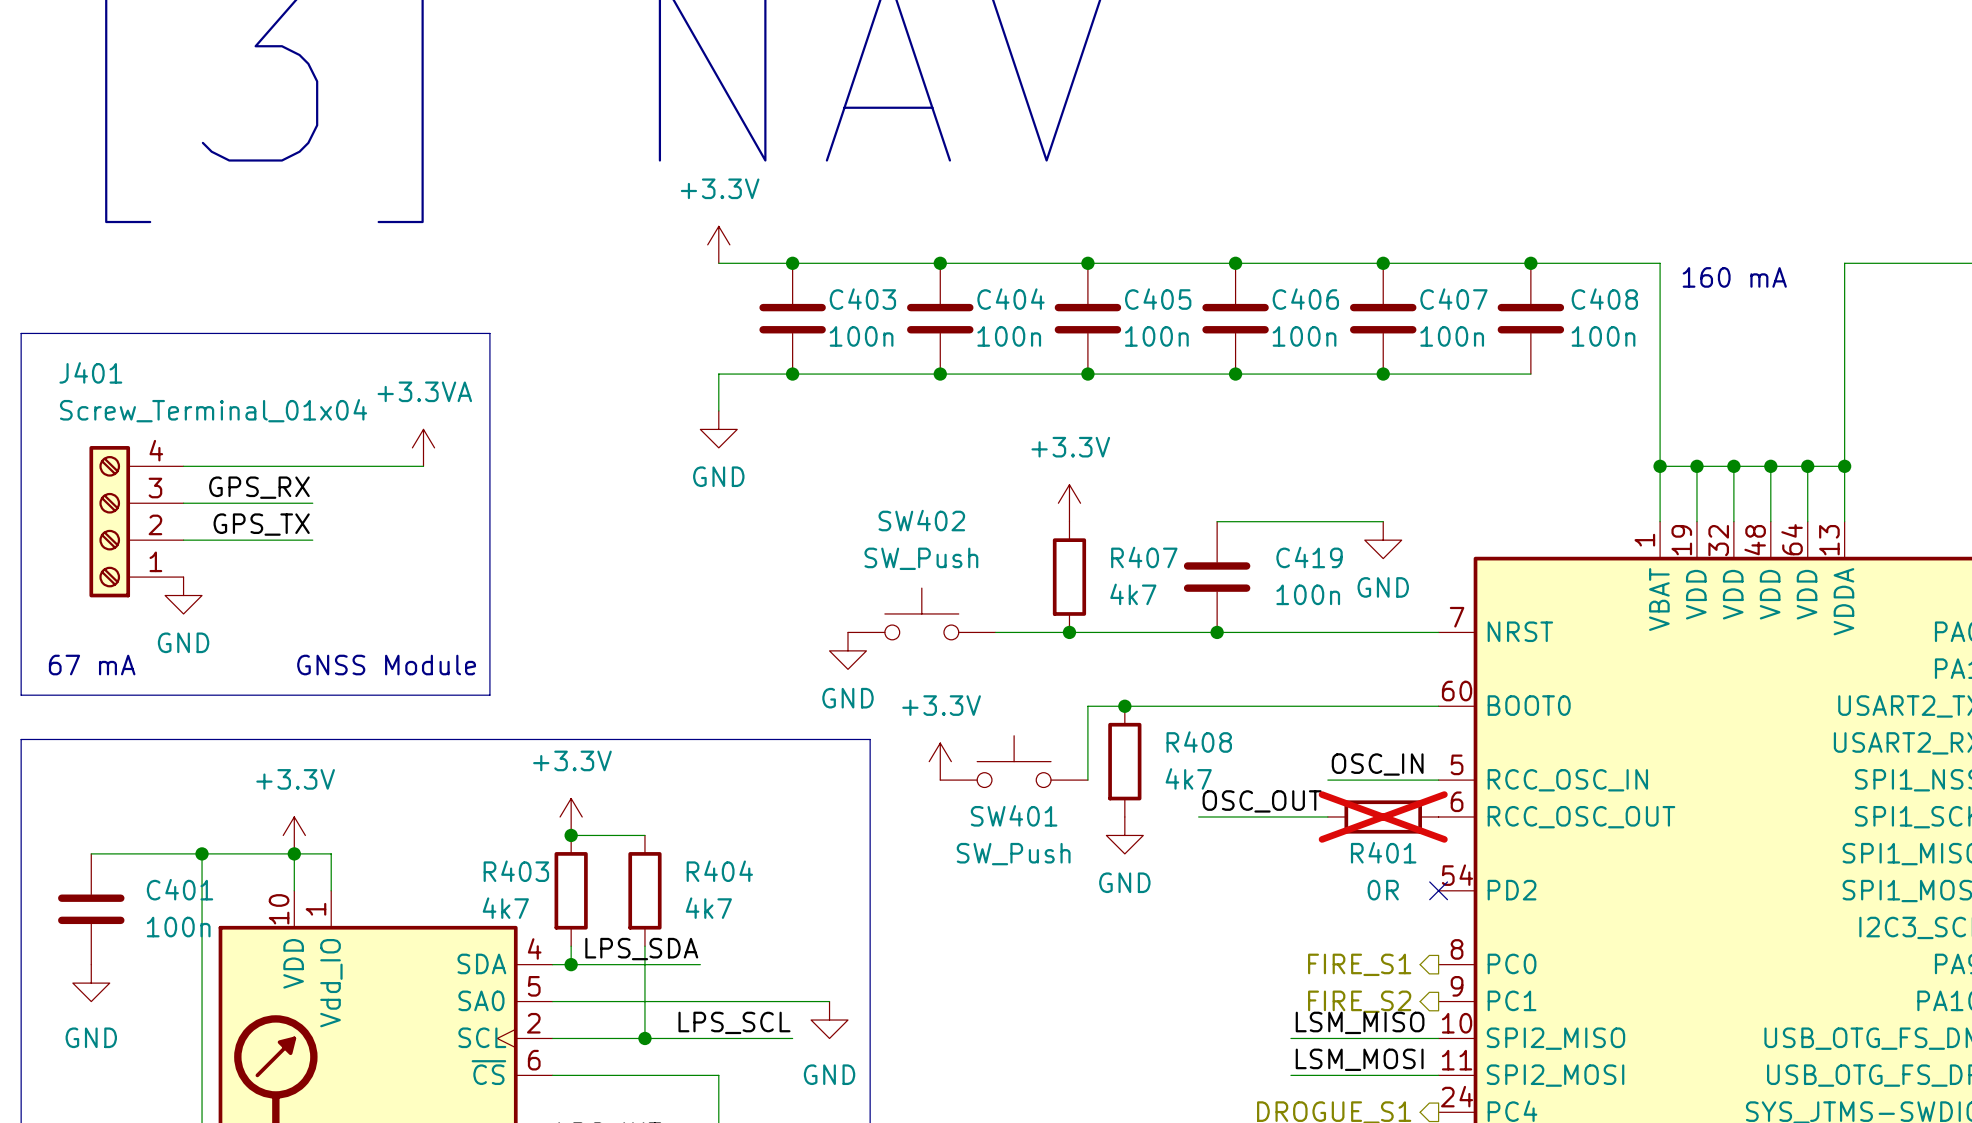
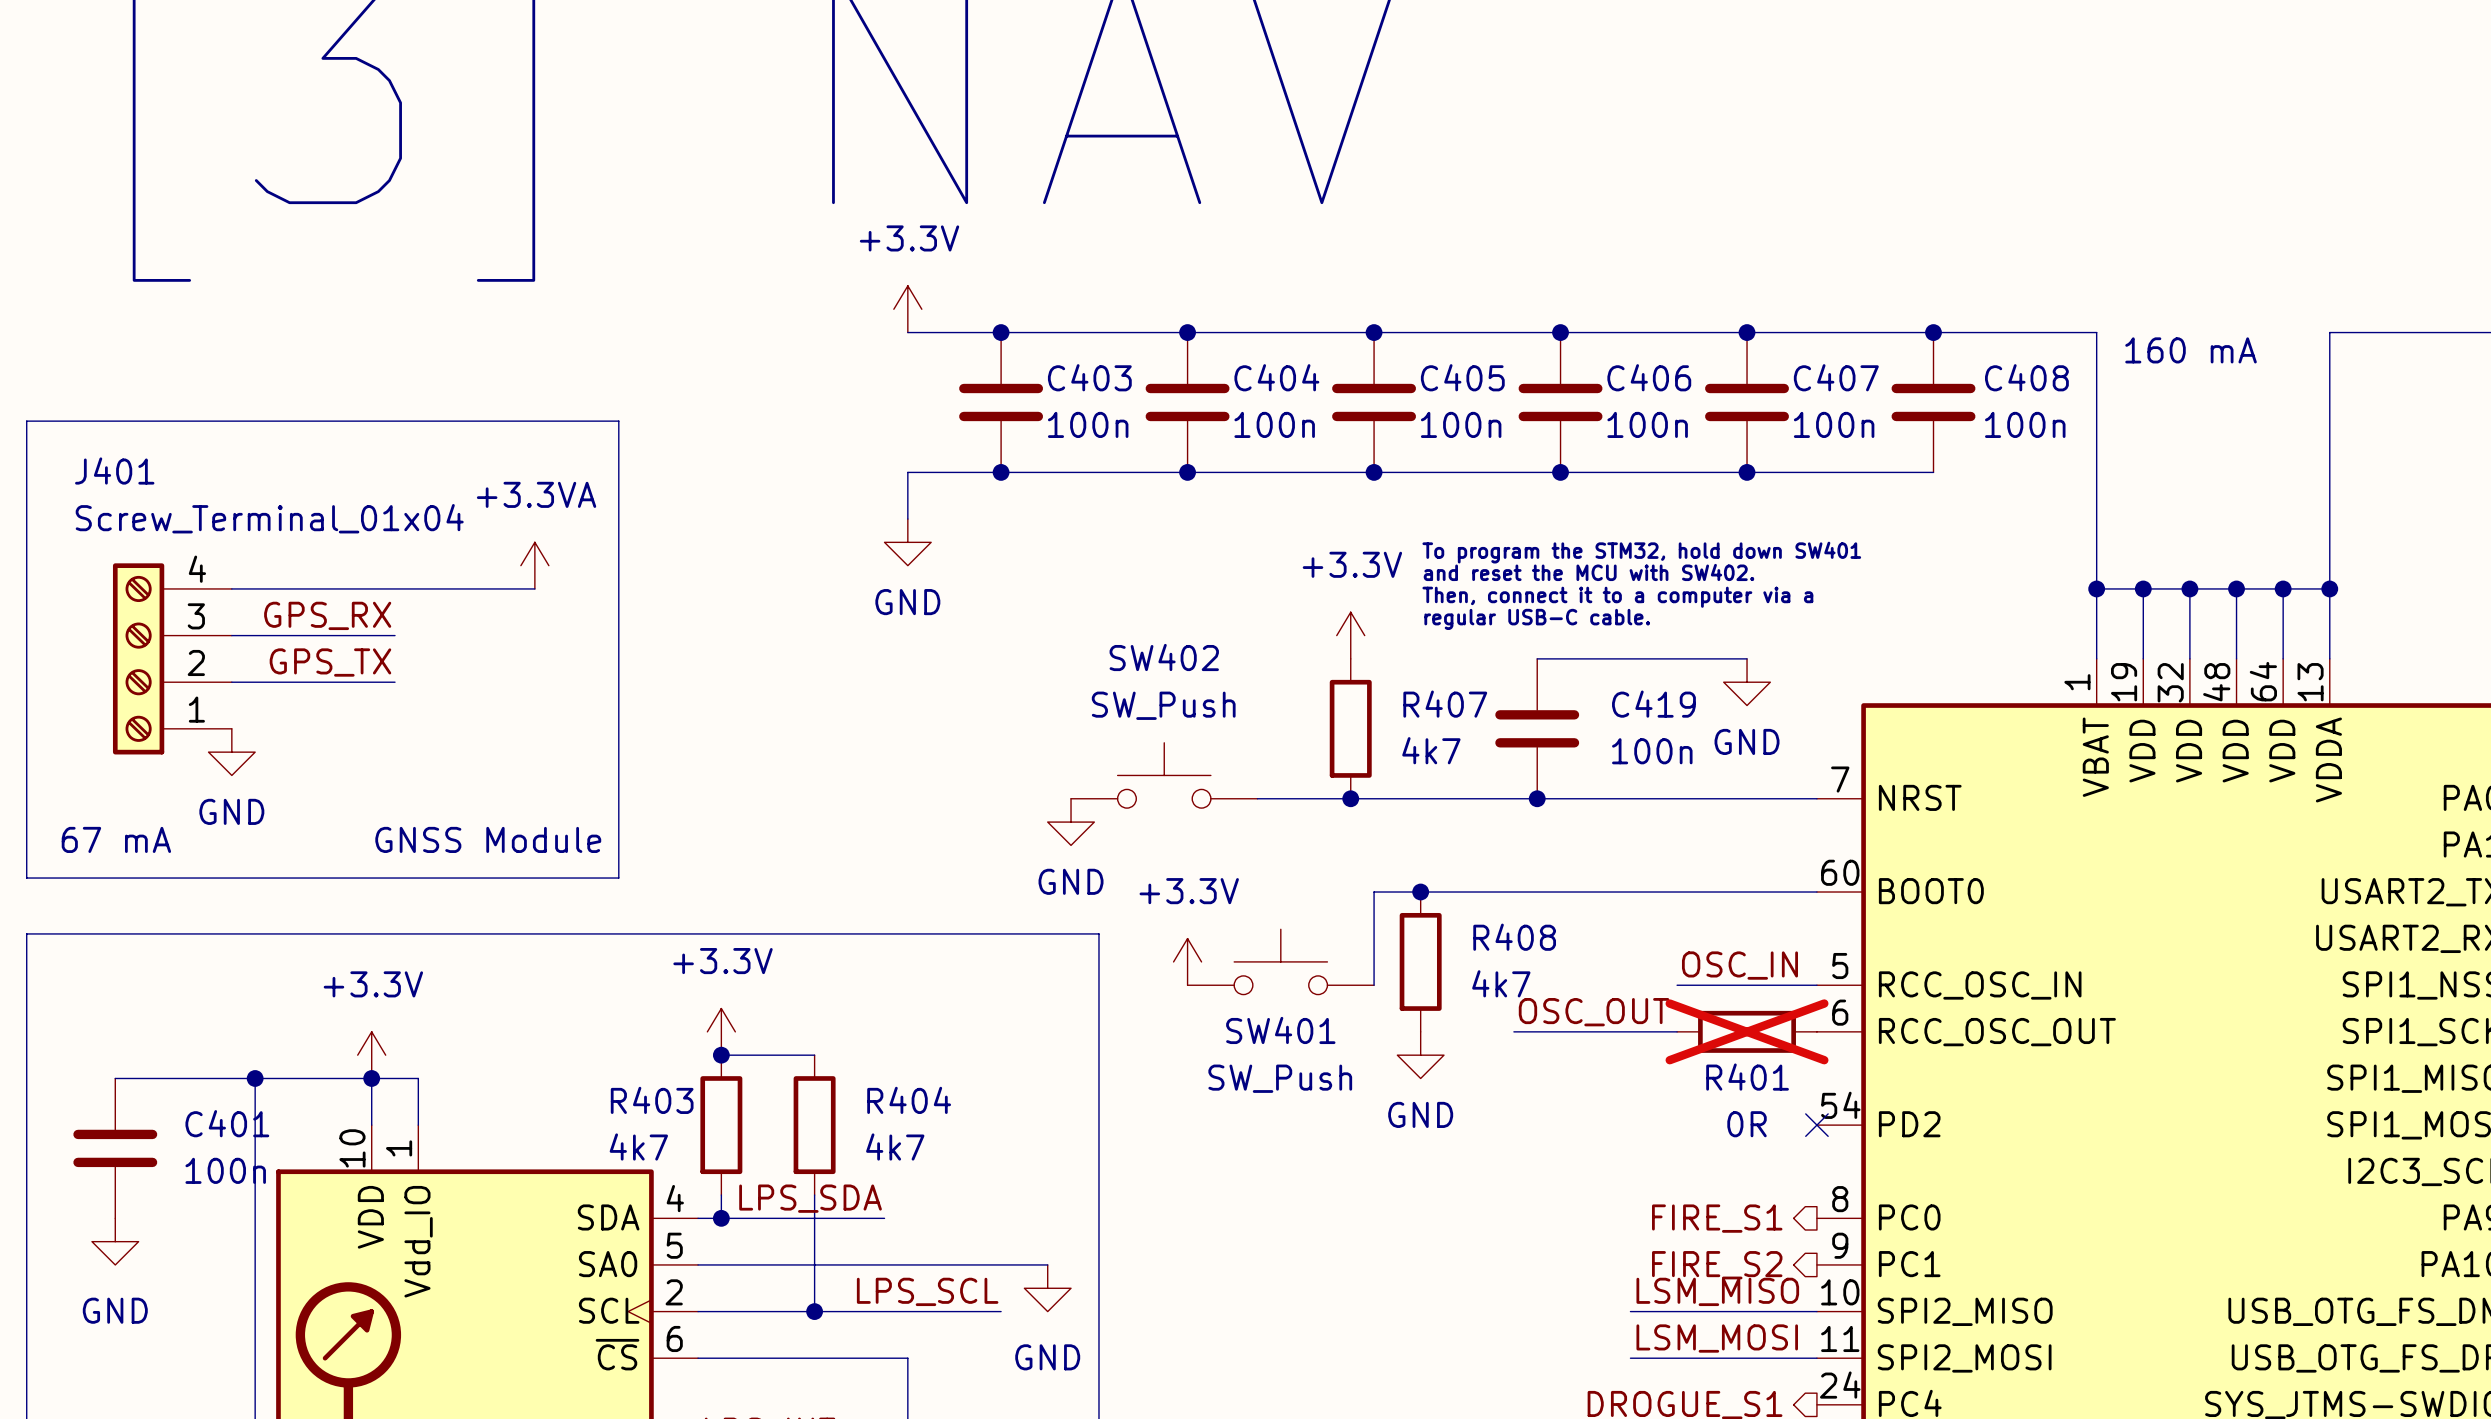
text: none -> To program the STM32, hold down SW401 (1641, 552)
text: none -> and reset the MCU with SW402. (1589, 572)
text: none -> Then, connect it to a computer via a (1617, 597)
text: none -> regular USB-C cable. (1537, 619)

